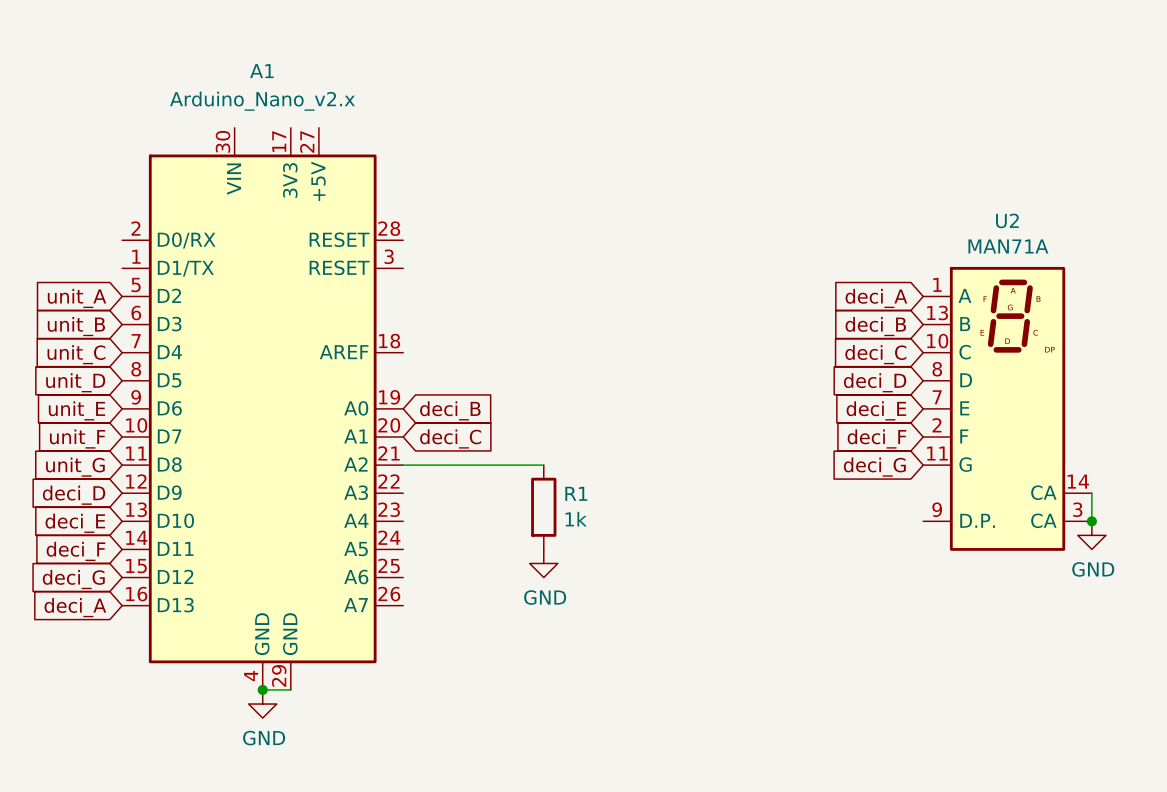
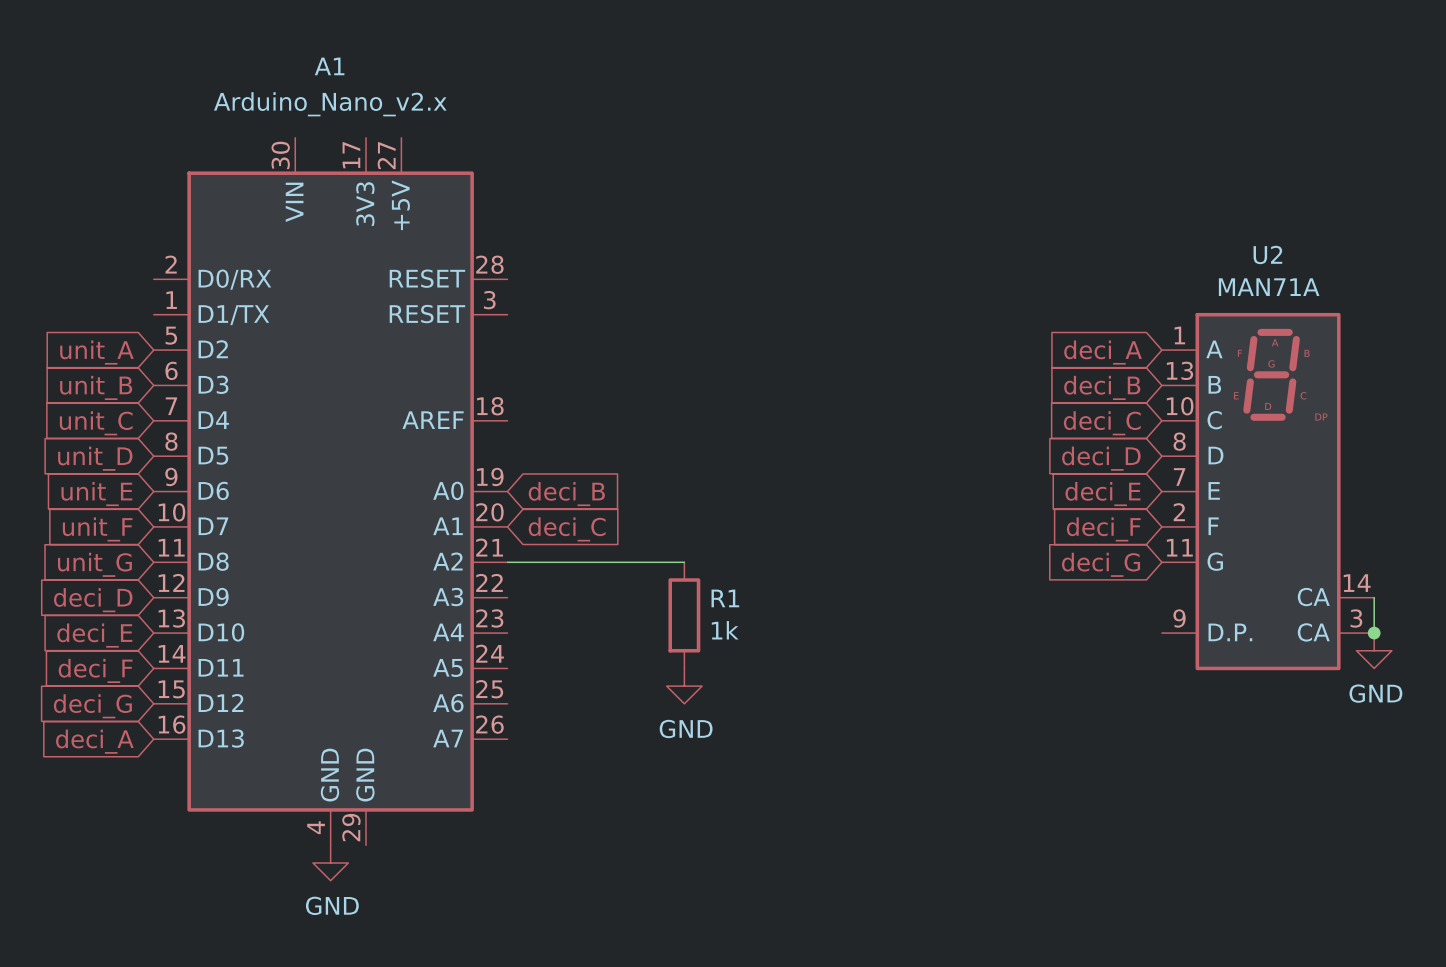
wire: (262, 689) (290, 689) -> none
junction: (262, 689) -> none

